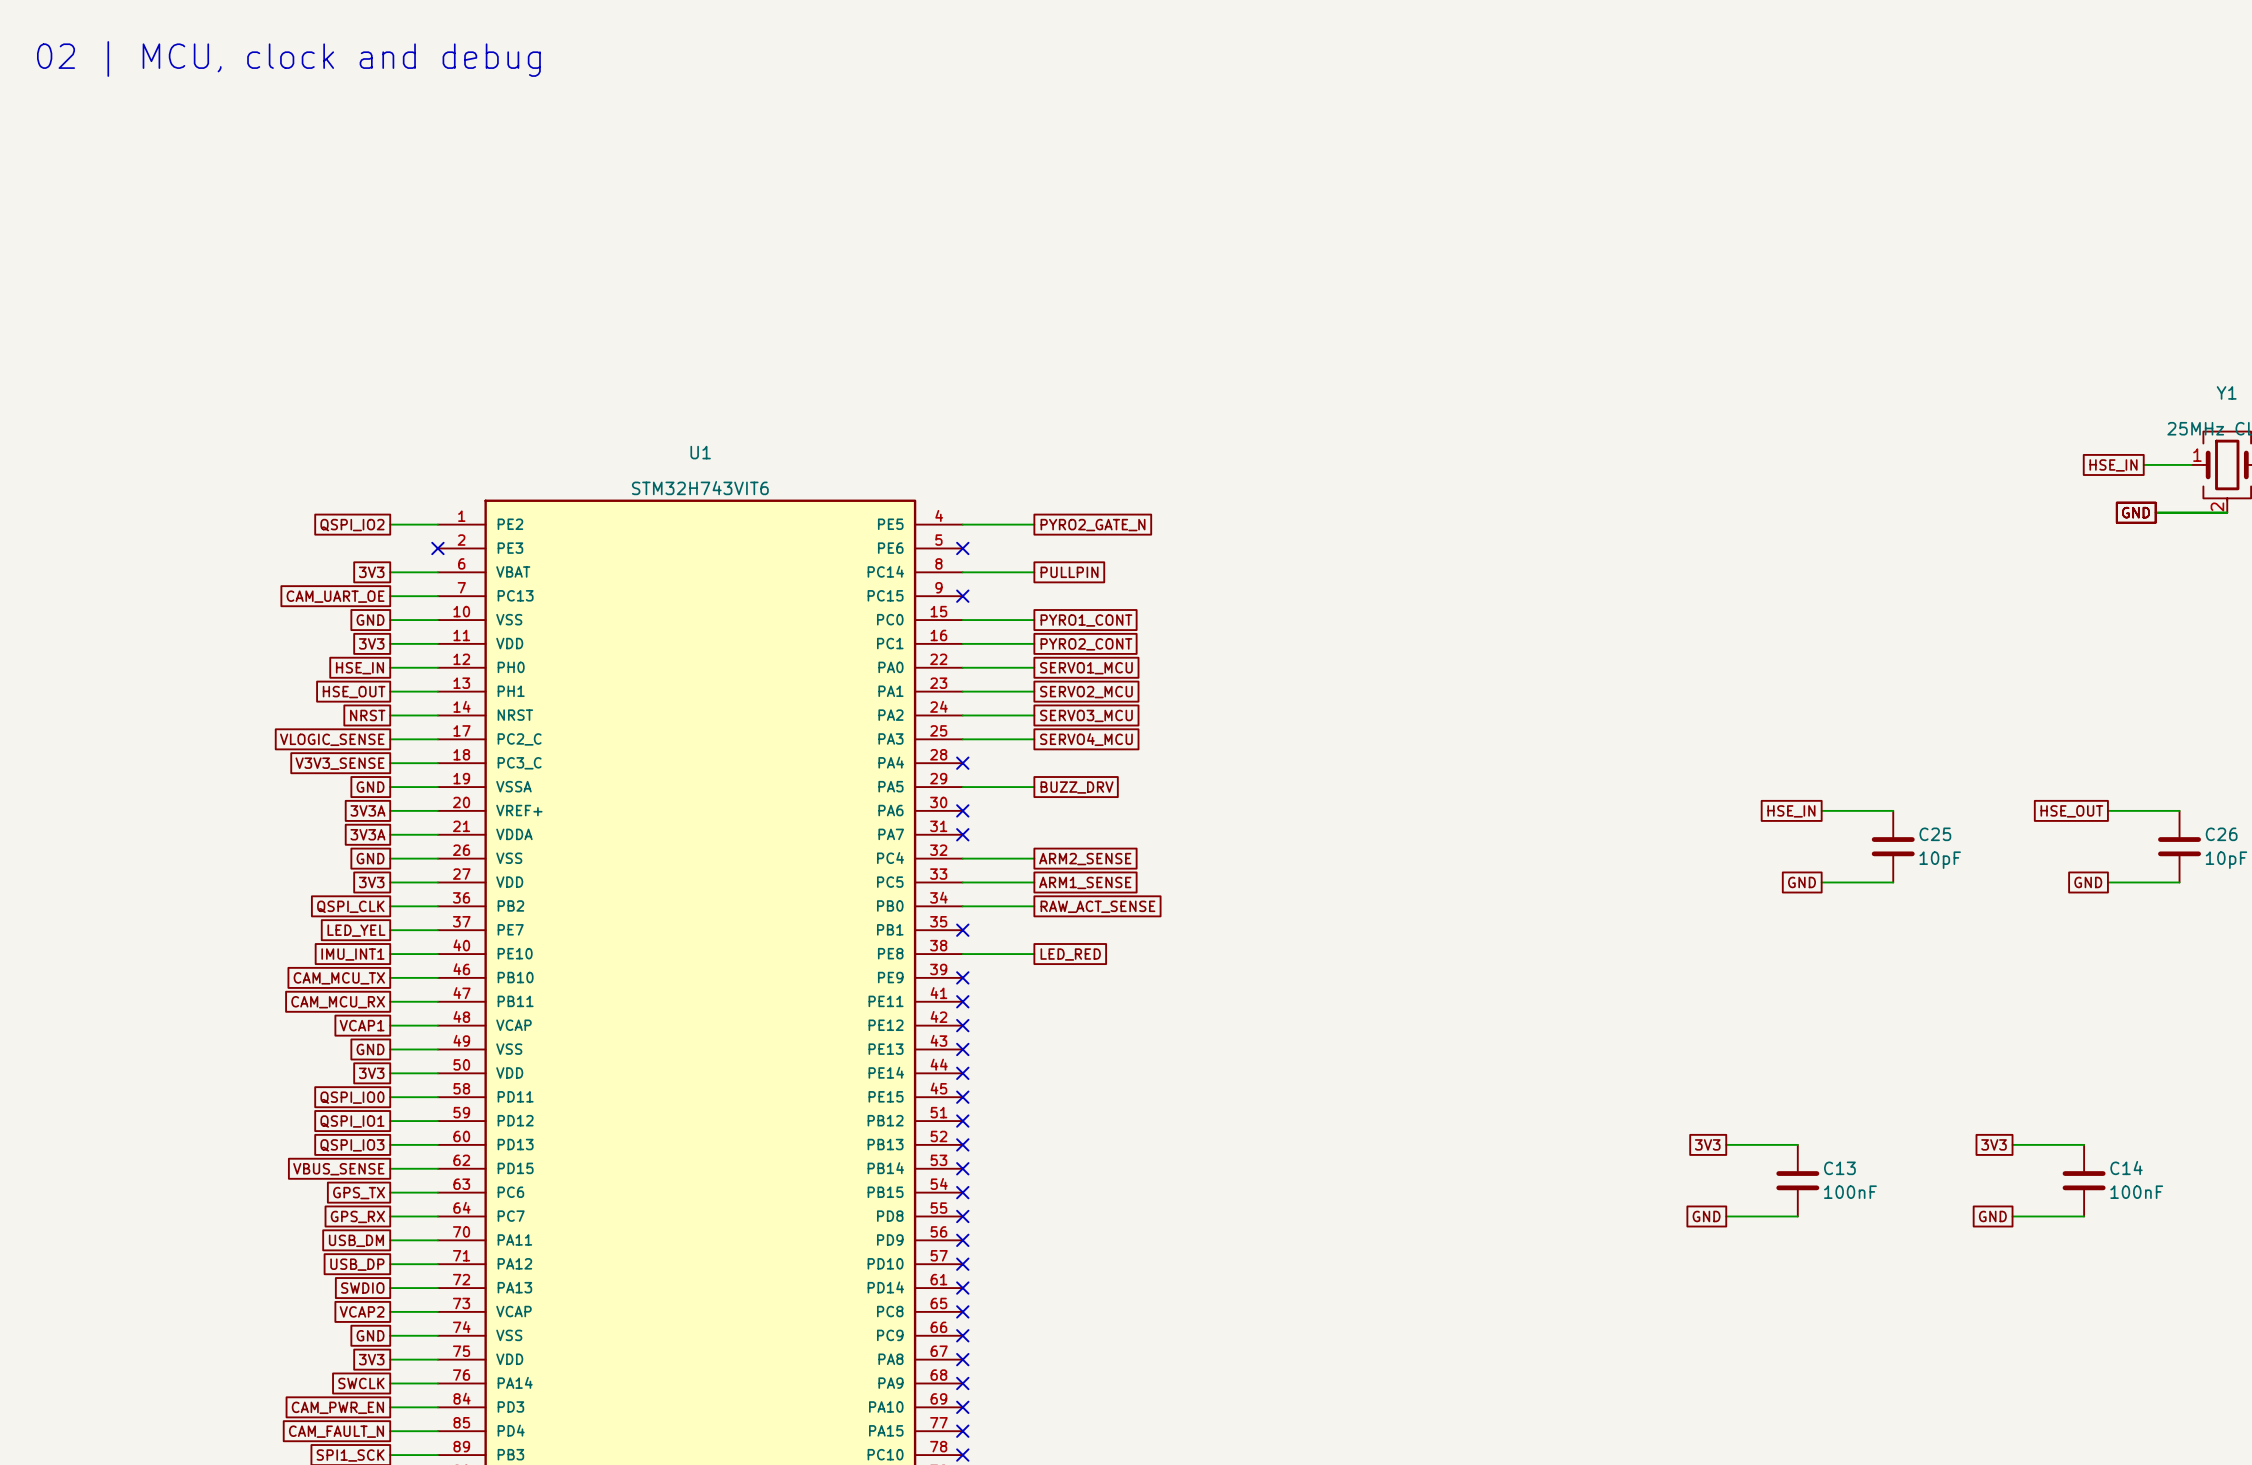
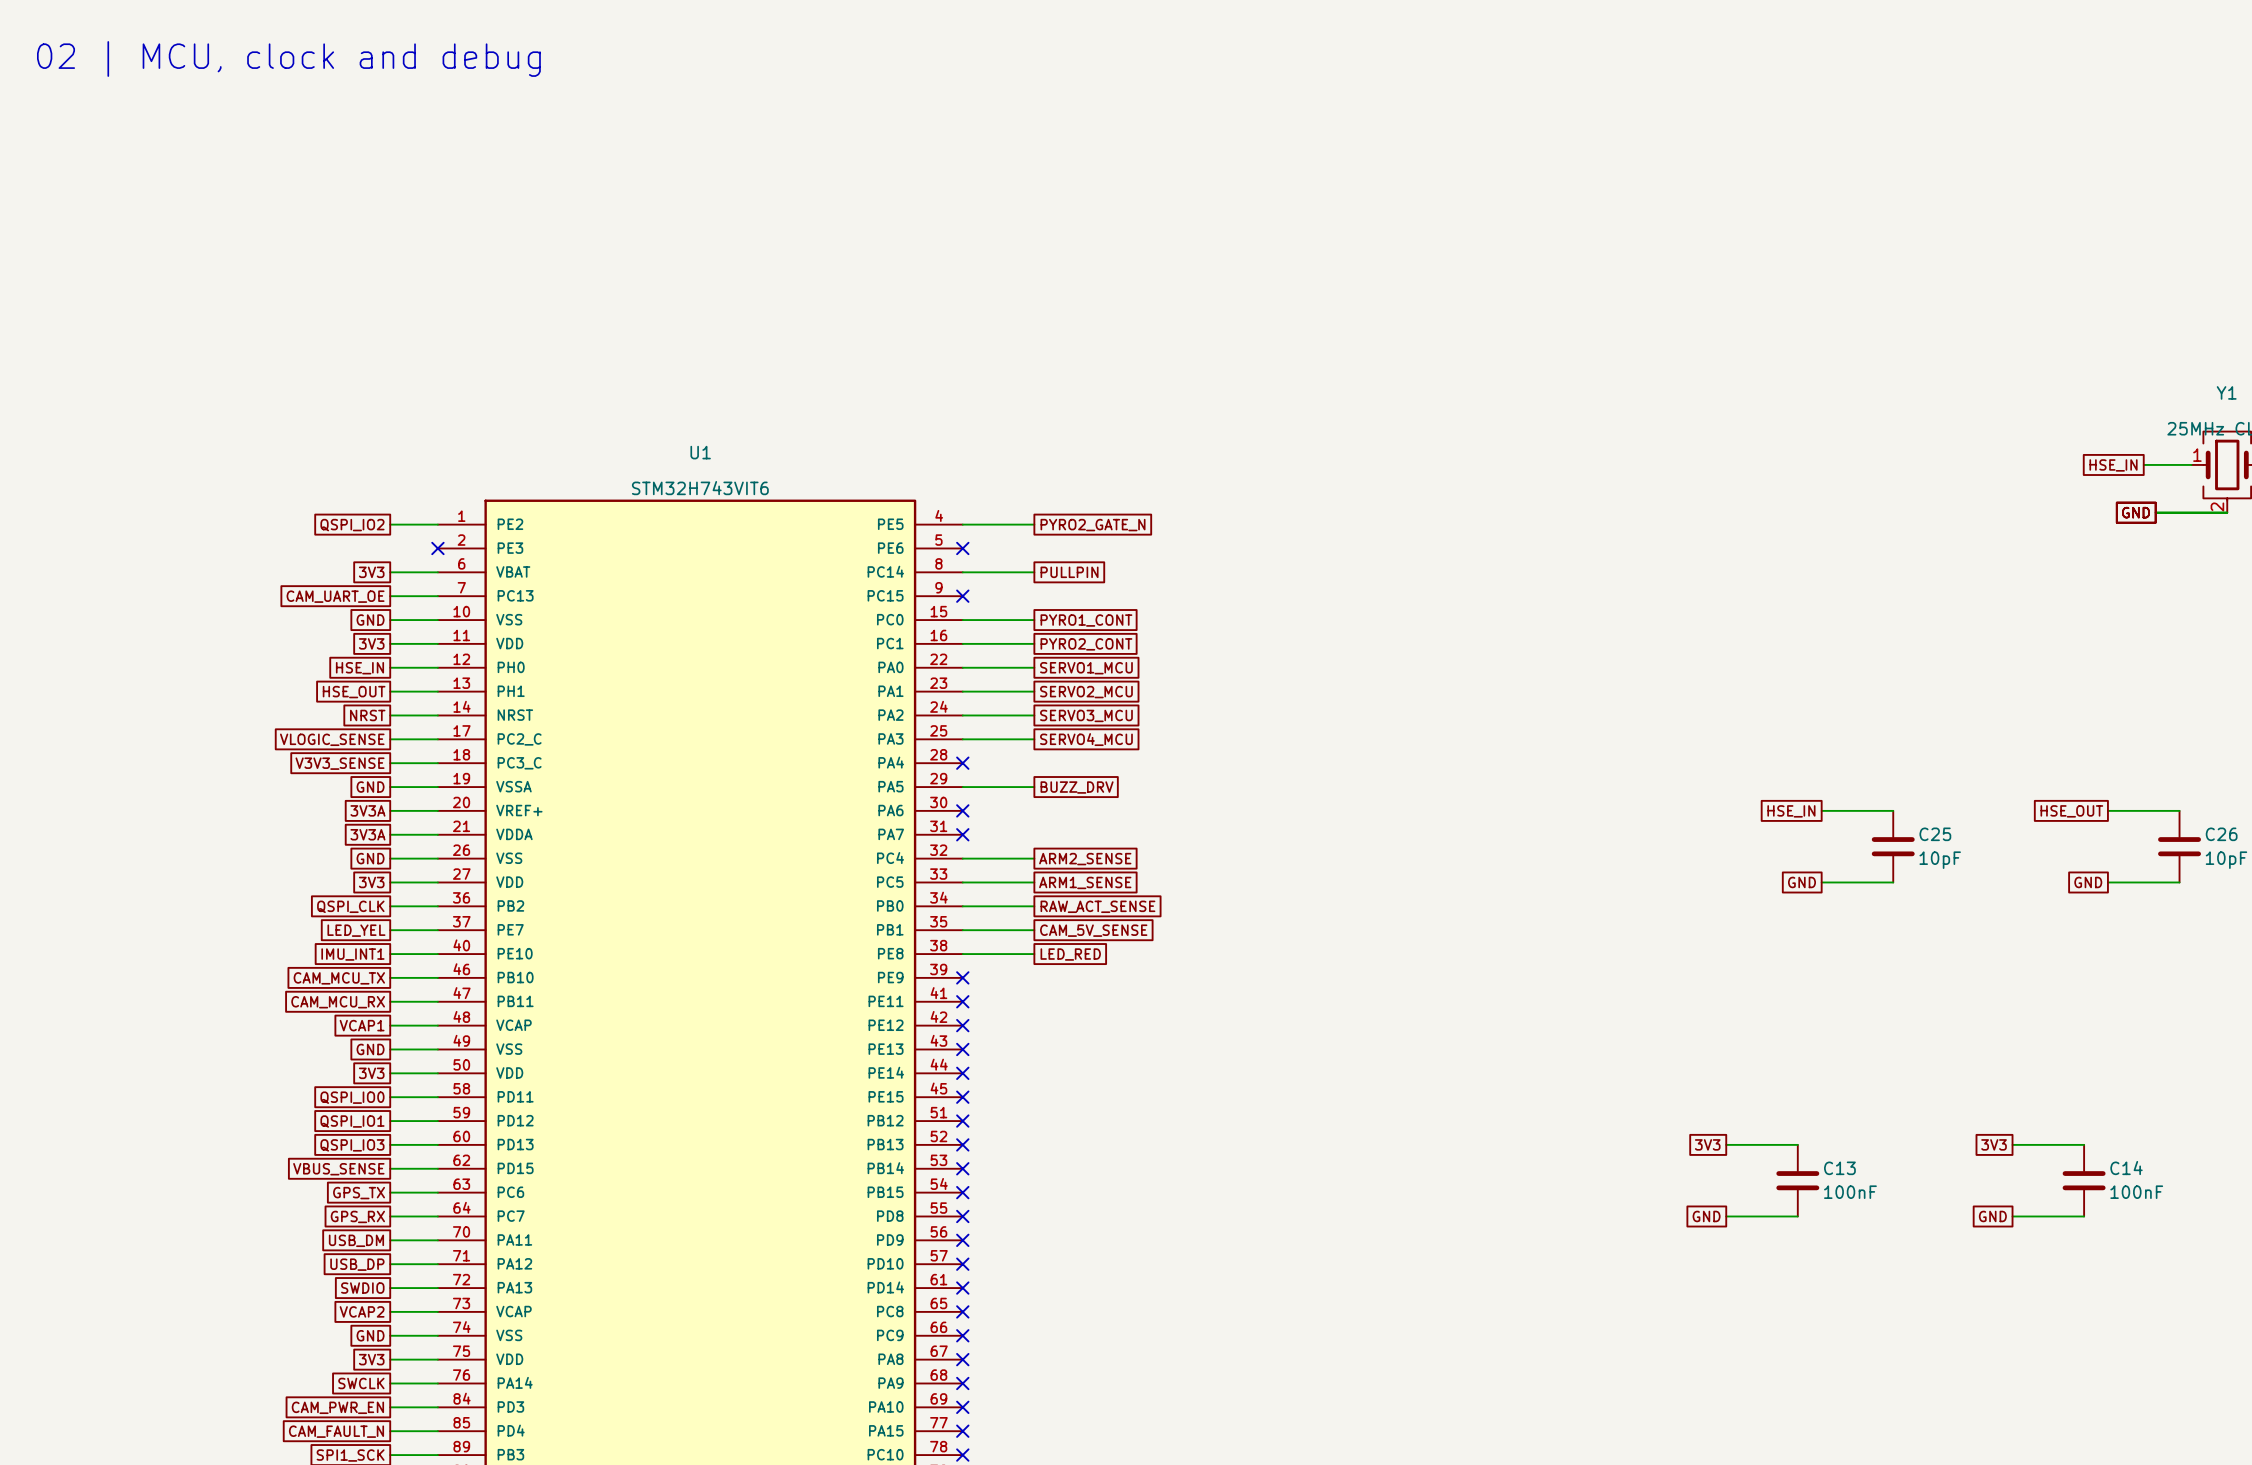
wire: none -> (962, 930) (1034, 930)
no-connect mark: (962, 930) -> none
global label: none -> CAM_5V_SENSE (1093, 930)

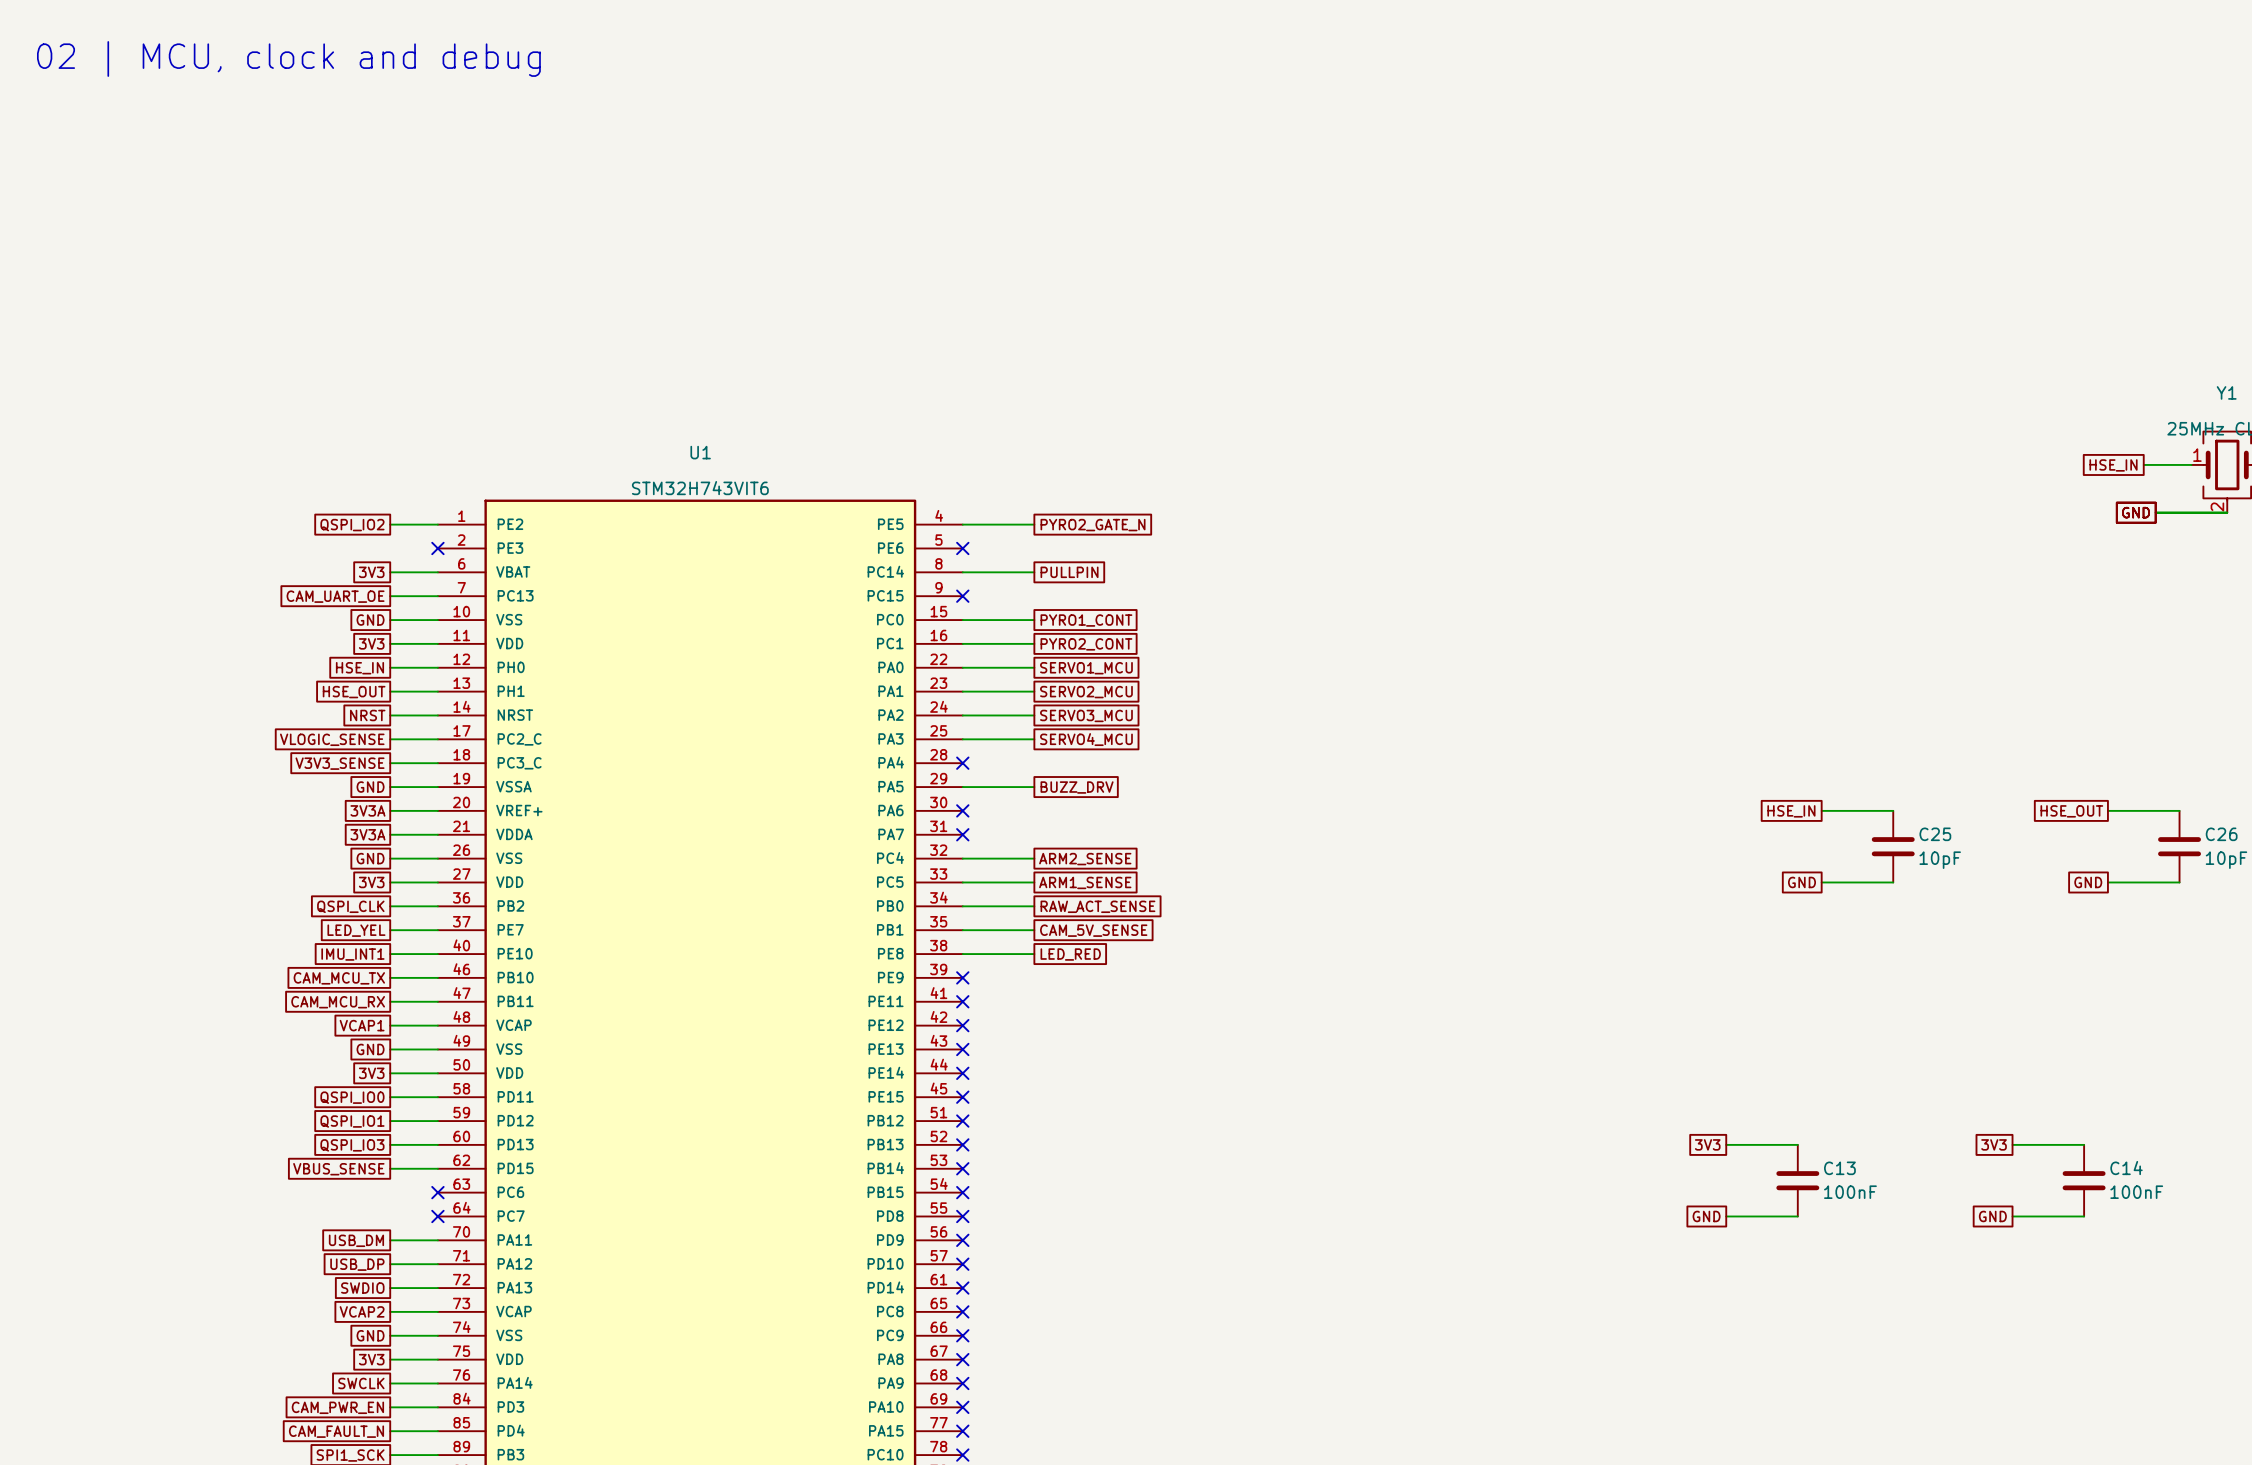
wire: (390, 1192) (437, 1192) -> none
no-connect mark: none -> (437, 1192)
global label: GPS_TX (359, 1193) -> none
global label: GPS_RX (357, 1216) -> none
wire: (390, 1216) (437, 1216) -> none
no-connect mark: none -> (437, 1216)

